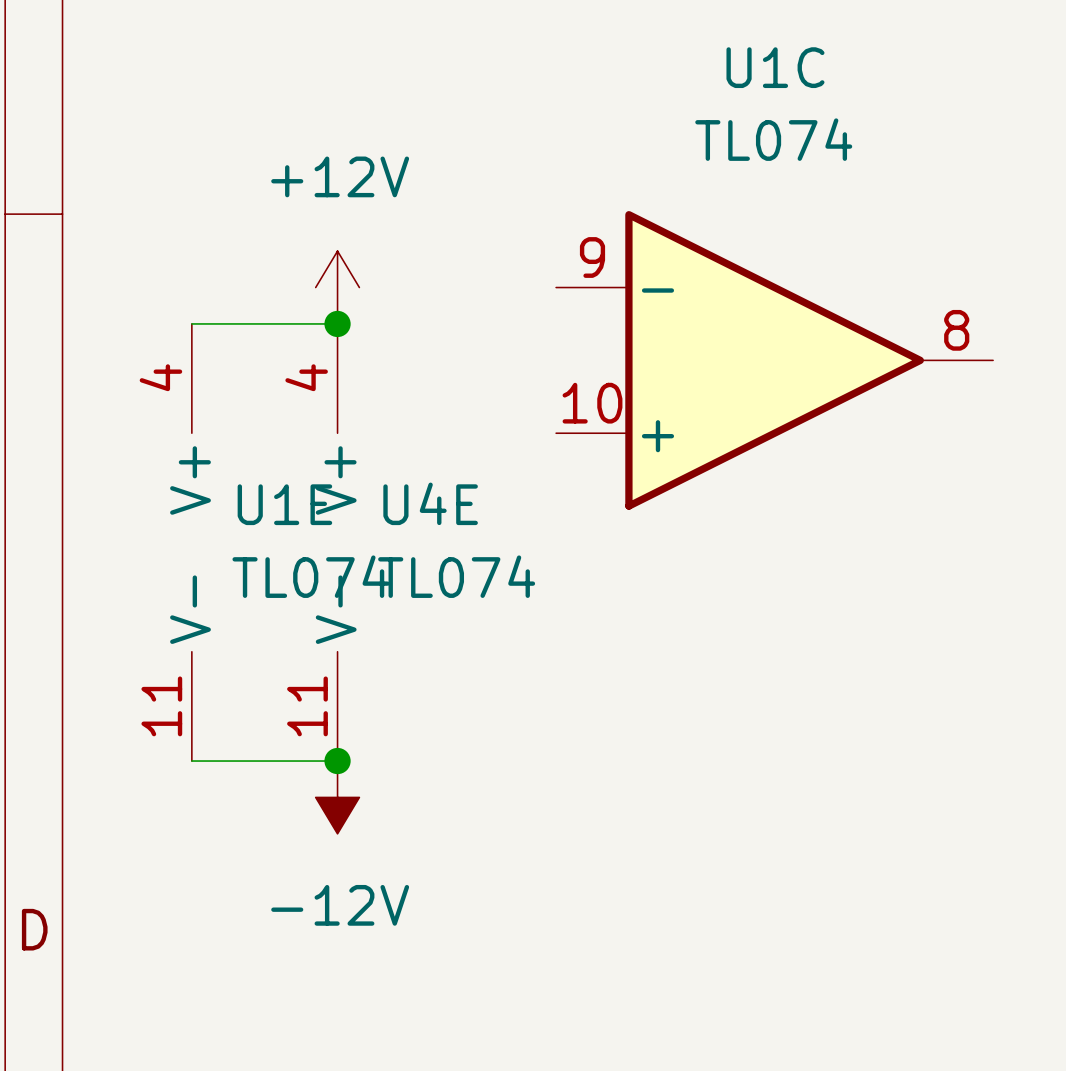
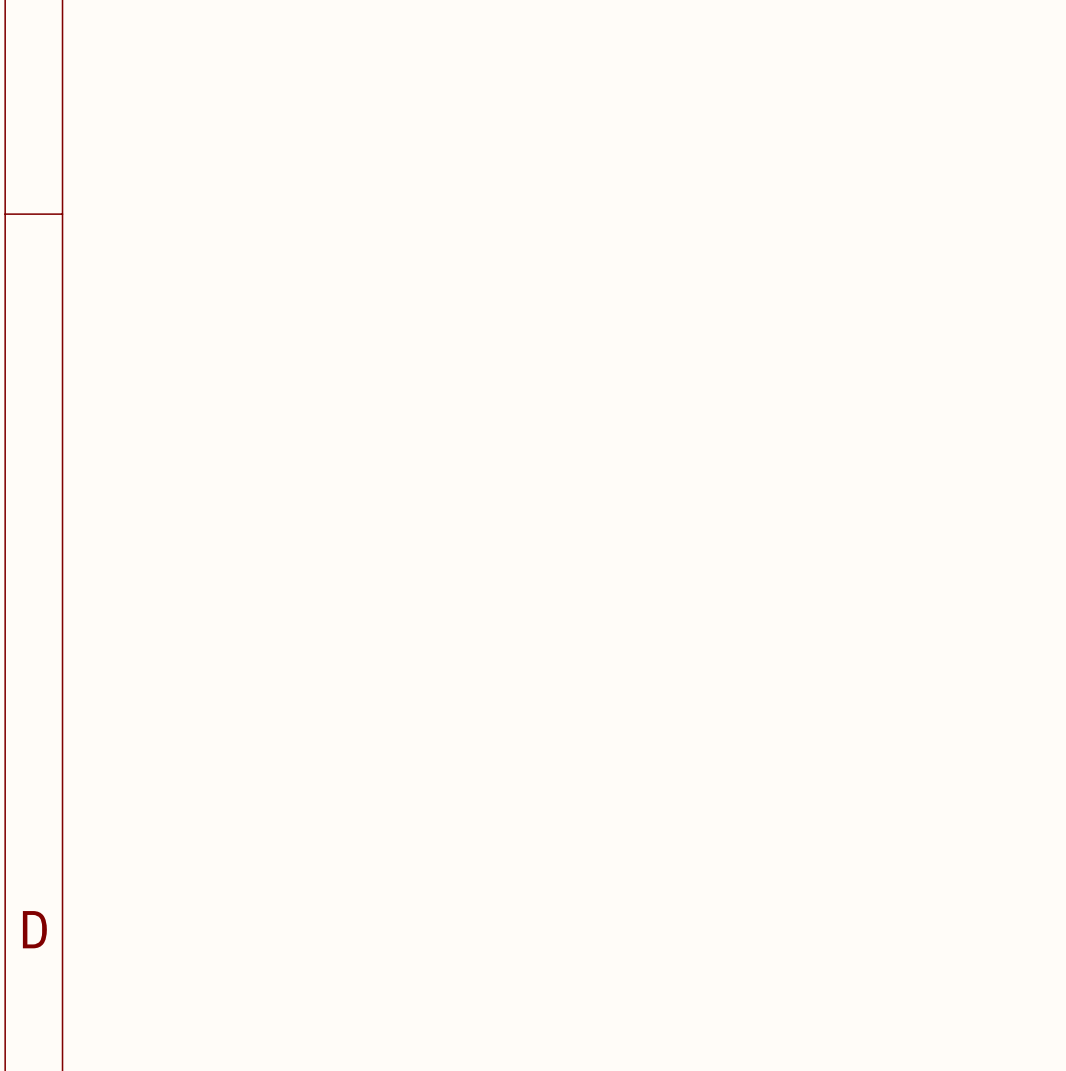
power symbol: +12V (337, 287) -> none
wire: (191, 323) (337, 323) -> none
junction: (337, 323) -> none
U1C: TL074 (774, 360) -> none
U1E: TL074 (191, 542) -> none
U4E: TL074 (337, 542) -> none
wire: (191, 761) (337, 761) -> none
junction: (337, 761) -> none
power symbol: -12V (337, 797) -> none

